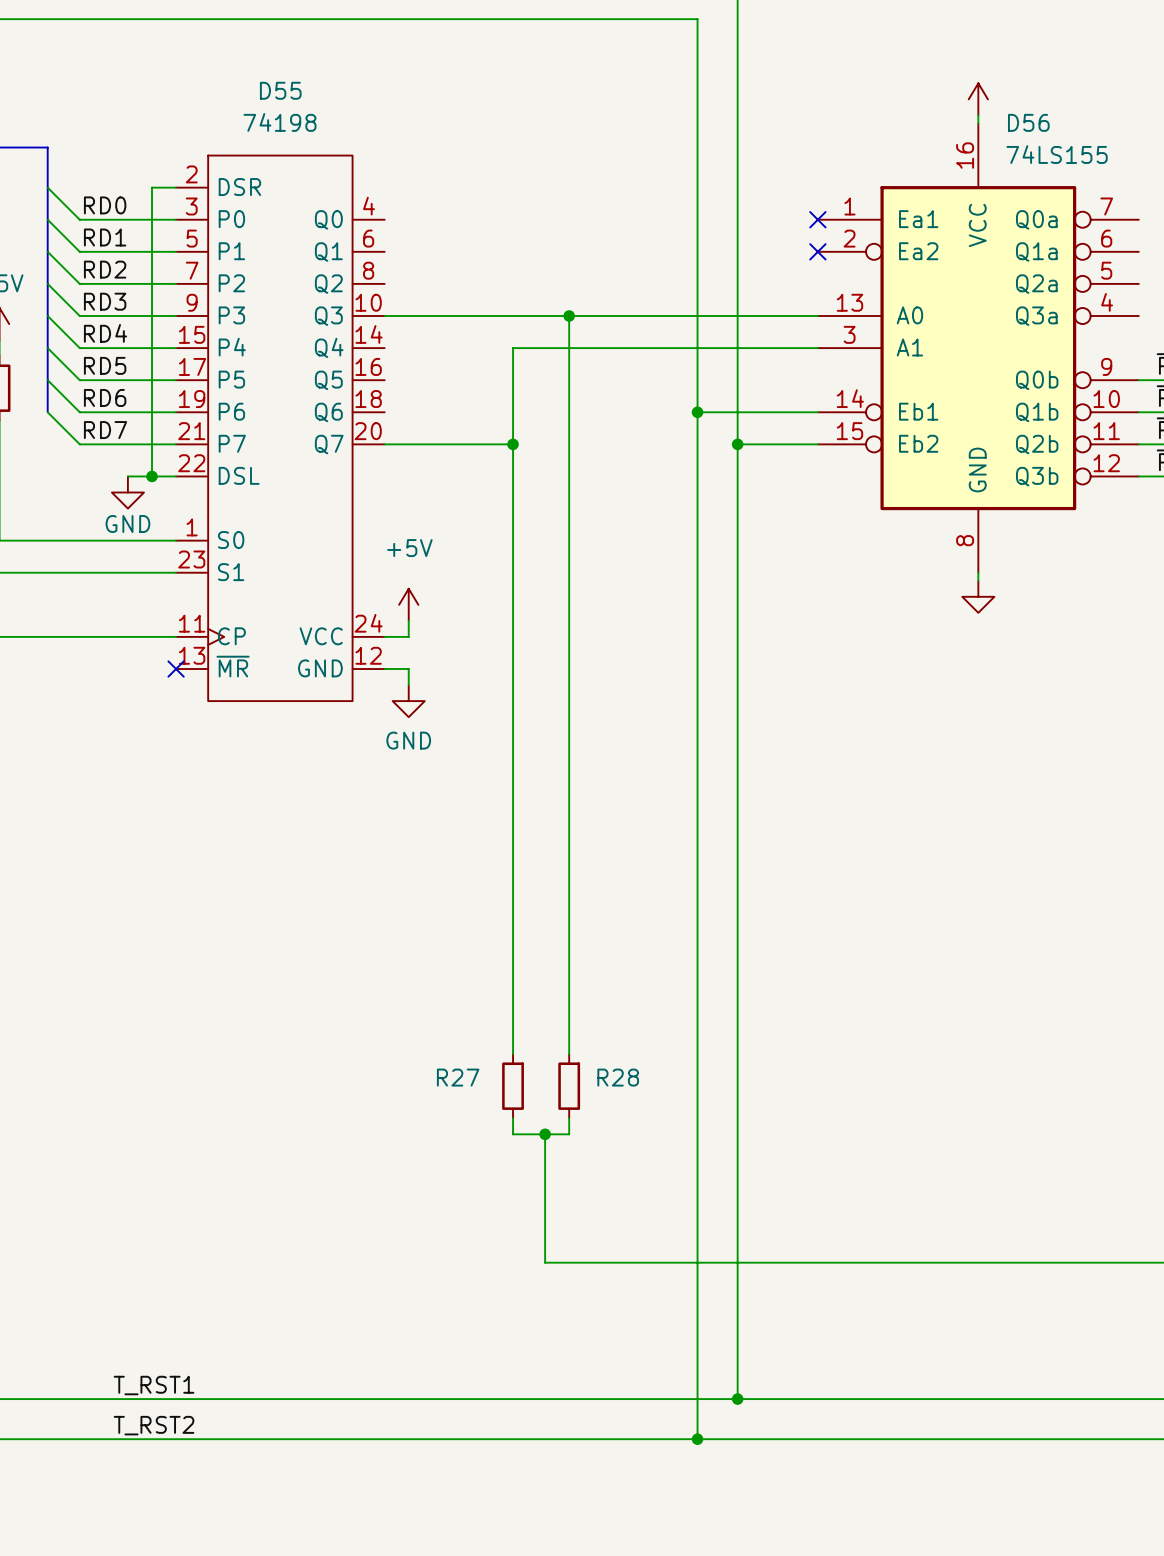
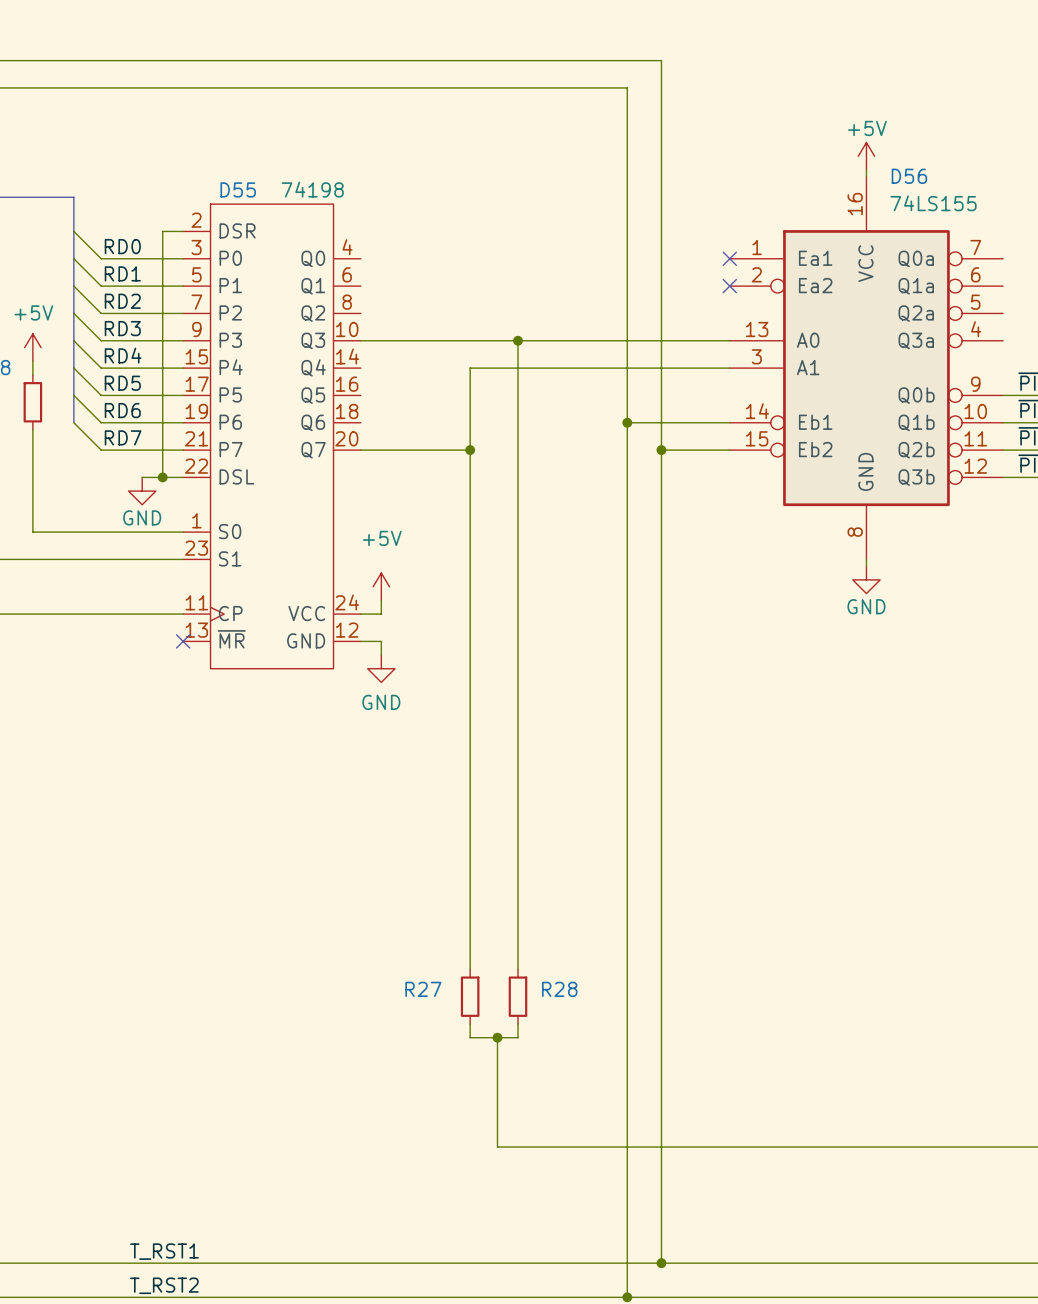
power symbol text: none -> +5V (867, 128)
D55 name position: D55 (280, 90) -> D55 (238, 189)
D55 value position: 74198 (279, 122) -> 74198 (312, 189)
power symbol text: none -> GND (866, 606)

